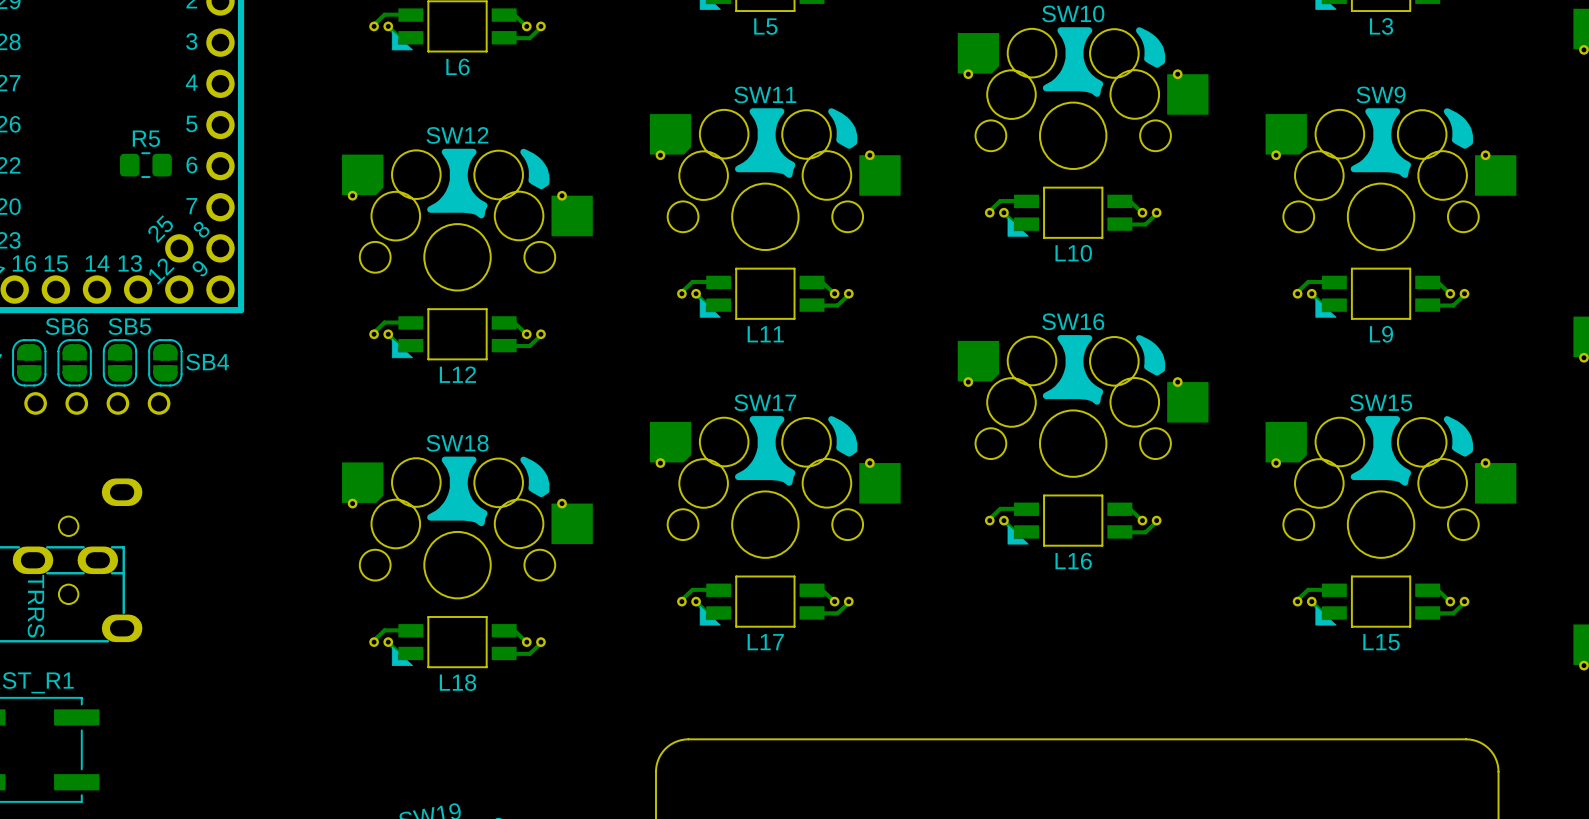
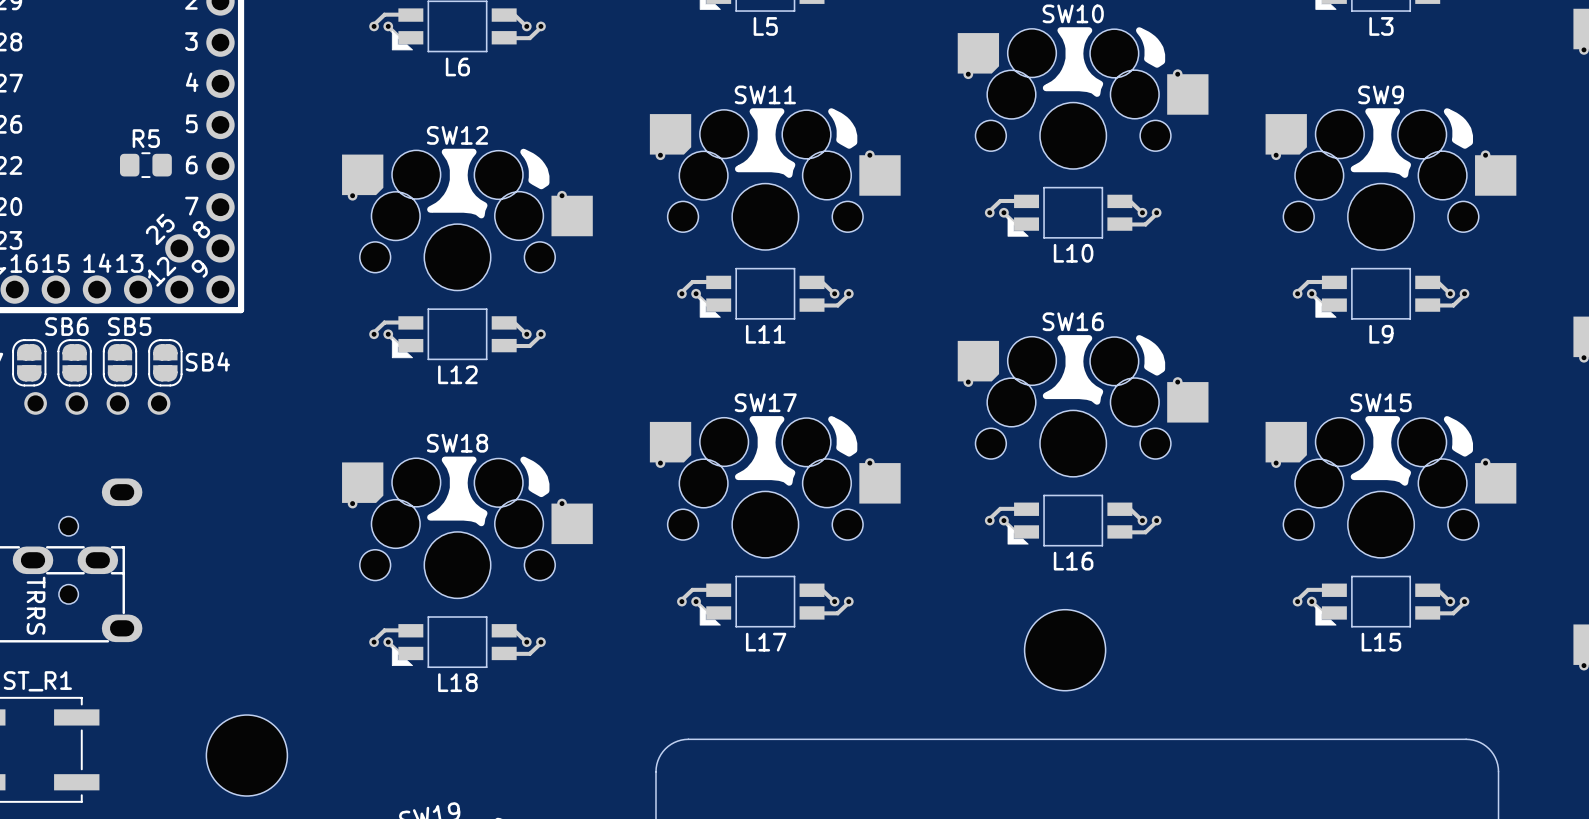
part: none -> (1065, 650)
part: none -> (246, 755)

